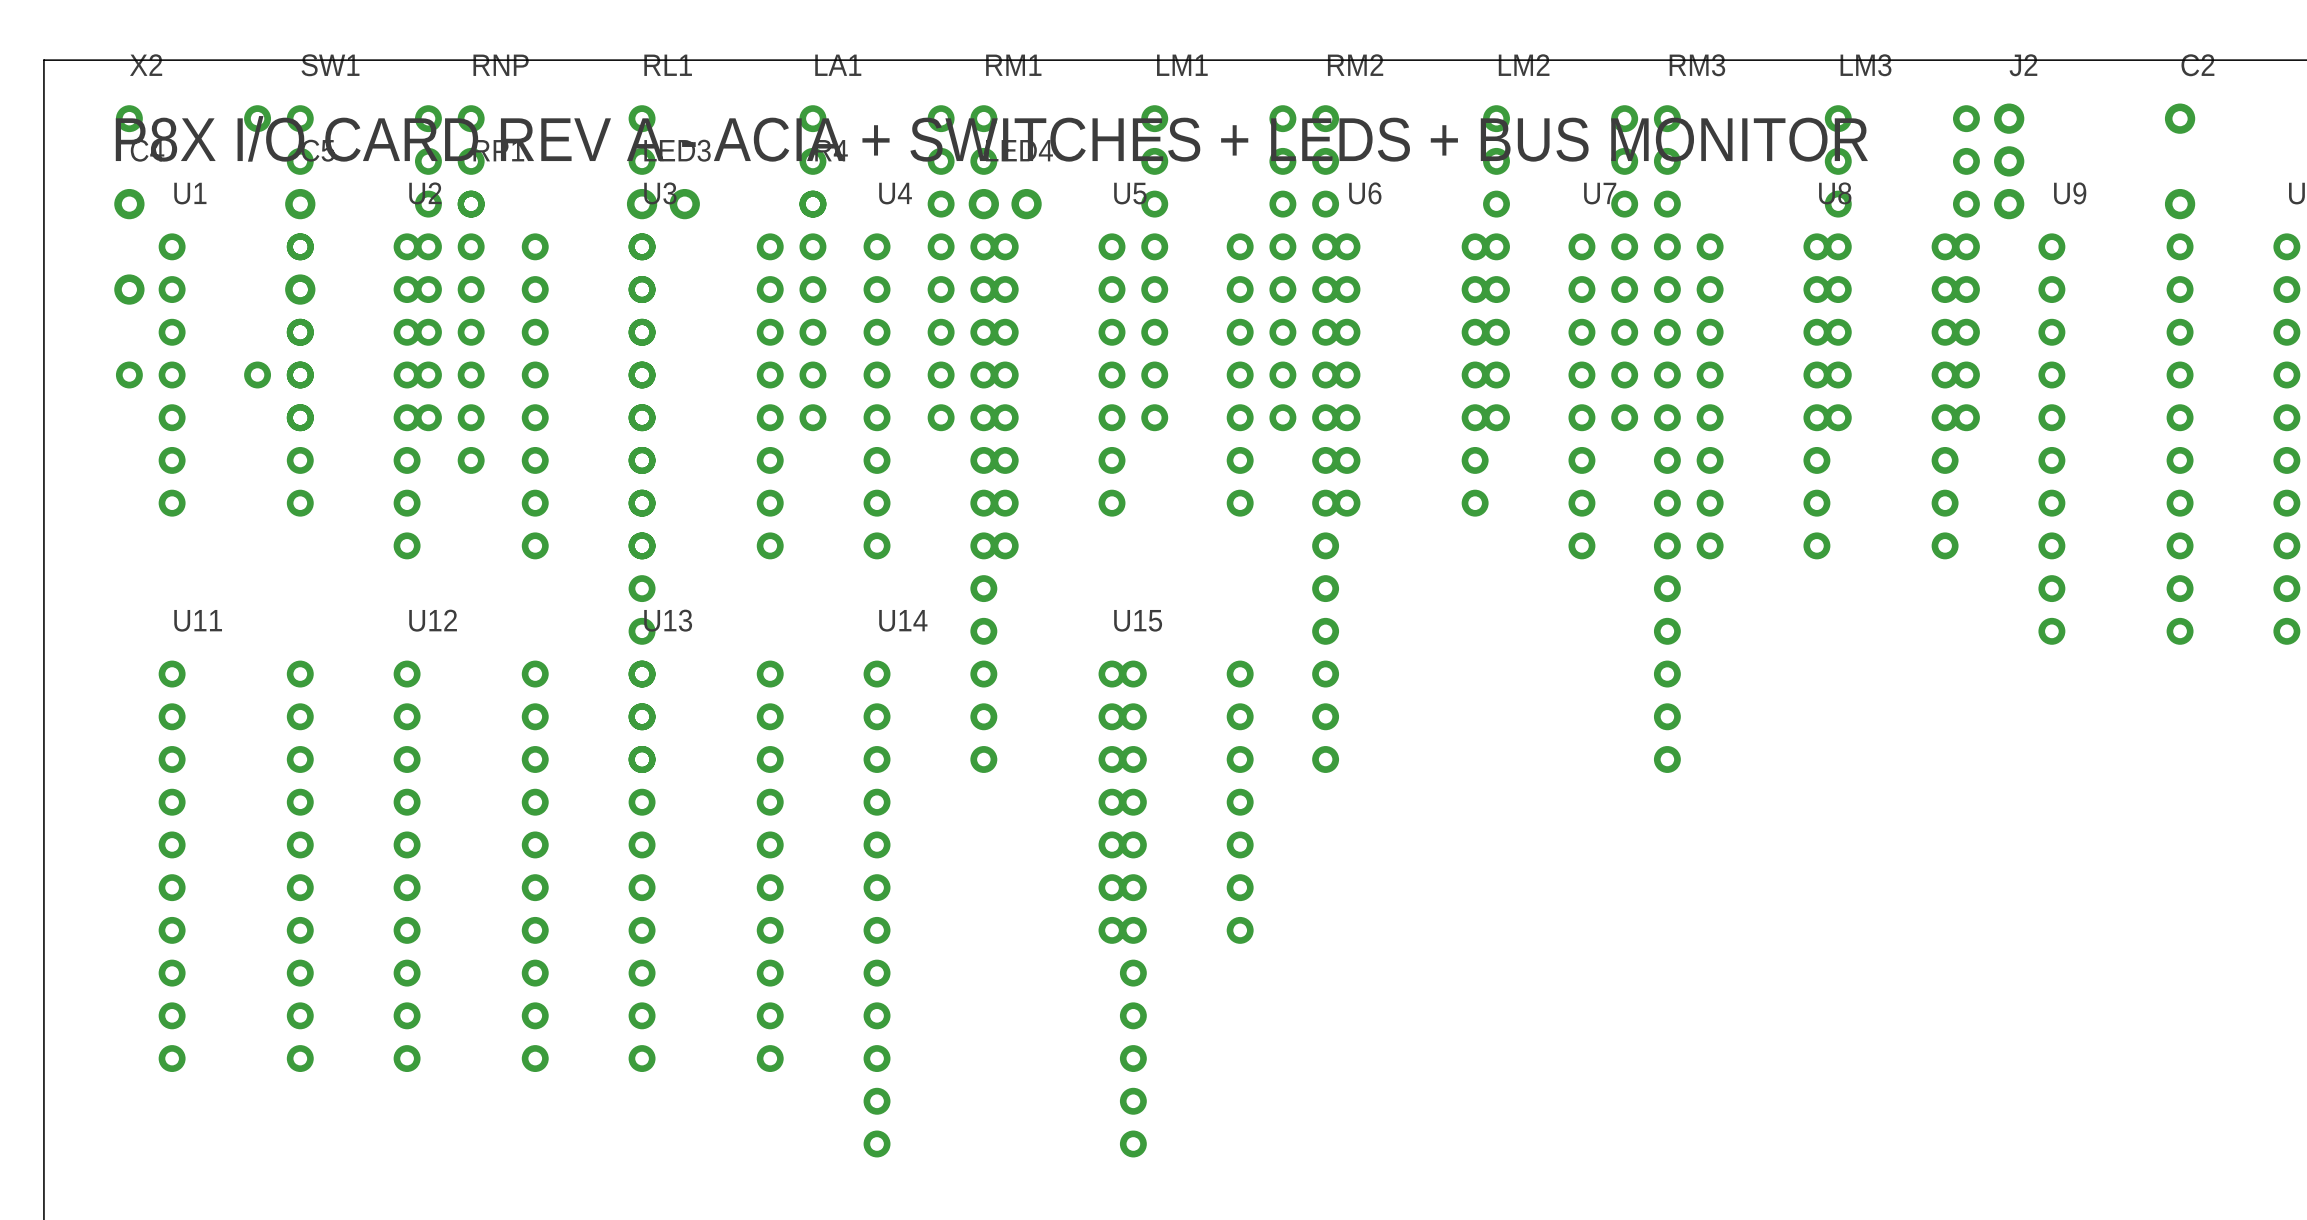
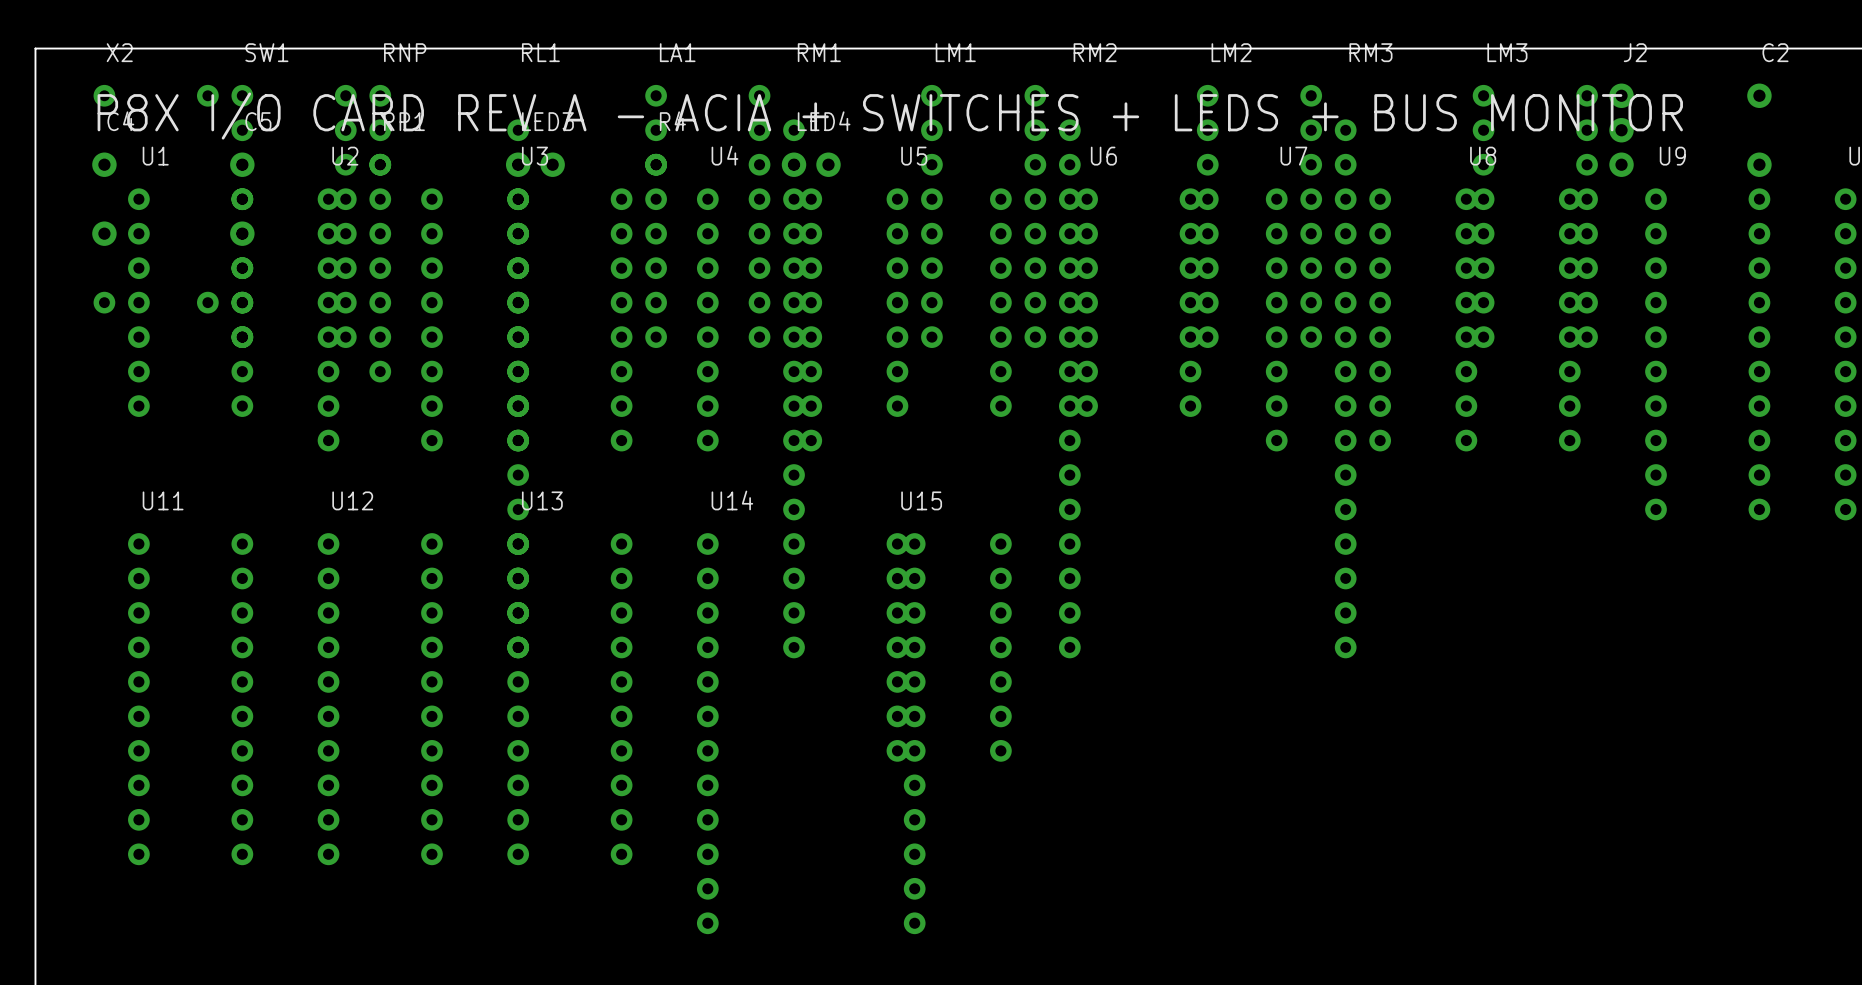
RL1 position: (642, 439) -> (518, 388)
RM1 position: (983, 439) -> (794, 388)
RM2 position: (1325, 439) -> (1069, 388)
RM3 position: (1667, 439) -> (1345, 388)

